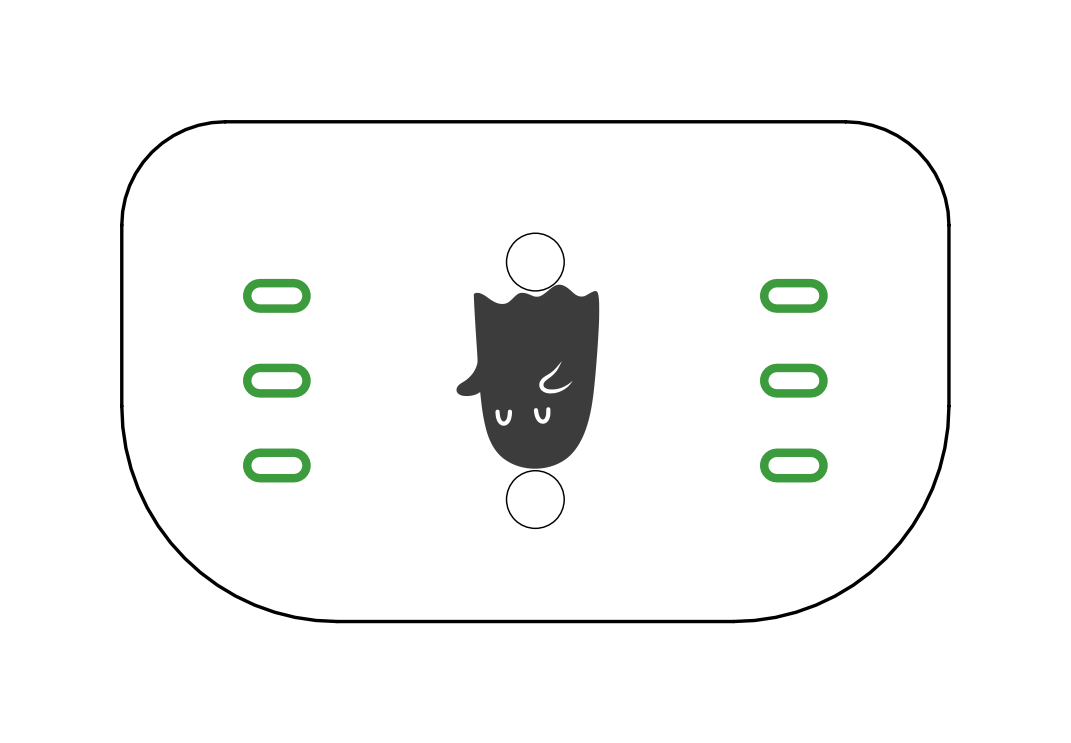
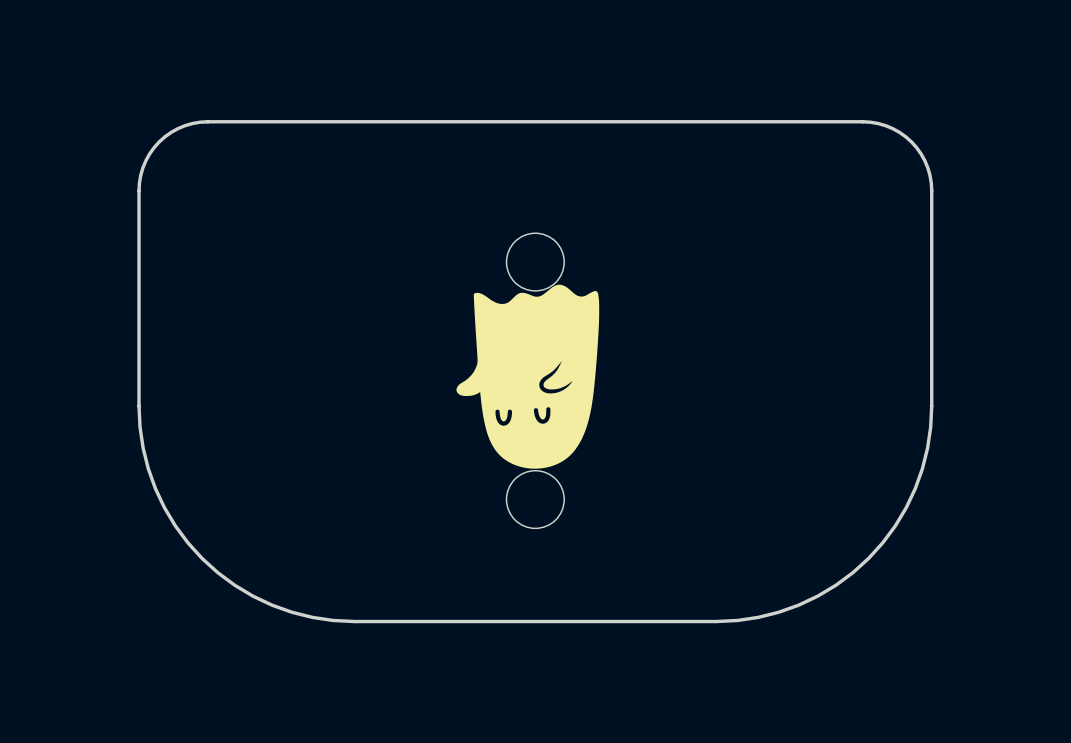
board edge: (225, 121) (198, 125) (173, 135) (162, 143) (152, 152) (135, 173) (125, 198) (121, 225) (121, 406) (125, 448) (131, 468) (138, 488) (158, 525) (184, 558) (217, 585) (235, 596) (274, 612) (316, 620) (354, 621) -> (225, 121) (192, 123) (171, 132) (154, 147) (145, 160) (140, 175) (139, 190) (139, 406) (140, 427) (148, 468) (164, 507) (187, 542) (217, 572) (234, 585) (271, 605) (291, 612) (333, 620) (354, 621)
board edge: (845, 121) (872, 125) (885, 129) (908, 143) (927, 162) (935, 173) (945, 198) (948, 225) (948, 406) (944, 448) (939, 468) (923, 507) (900, 542) (885, 558) (853, 585) (835, 596) (796, 612) (754, 620) (716, 621) -> (845, 121) (878, 123) (899, 132) (916, 147) (924, 160) (929, 175) (931, 190) (931, 406) (930, 427) (922, 468) (915, 488) (895, 525) (868, 558) (852, 572) (817, 596) (798, 605) (758, 617) (716, 621)
part: (276, 380) -> none
part: (793, 380) -> none

